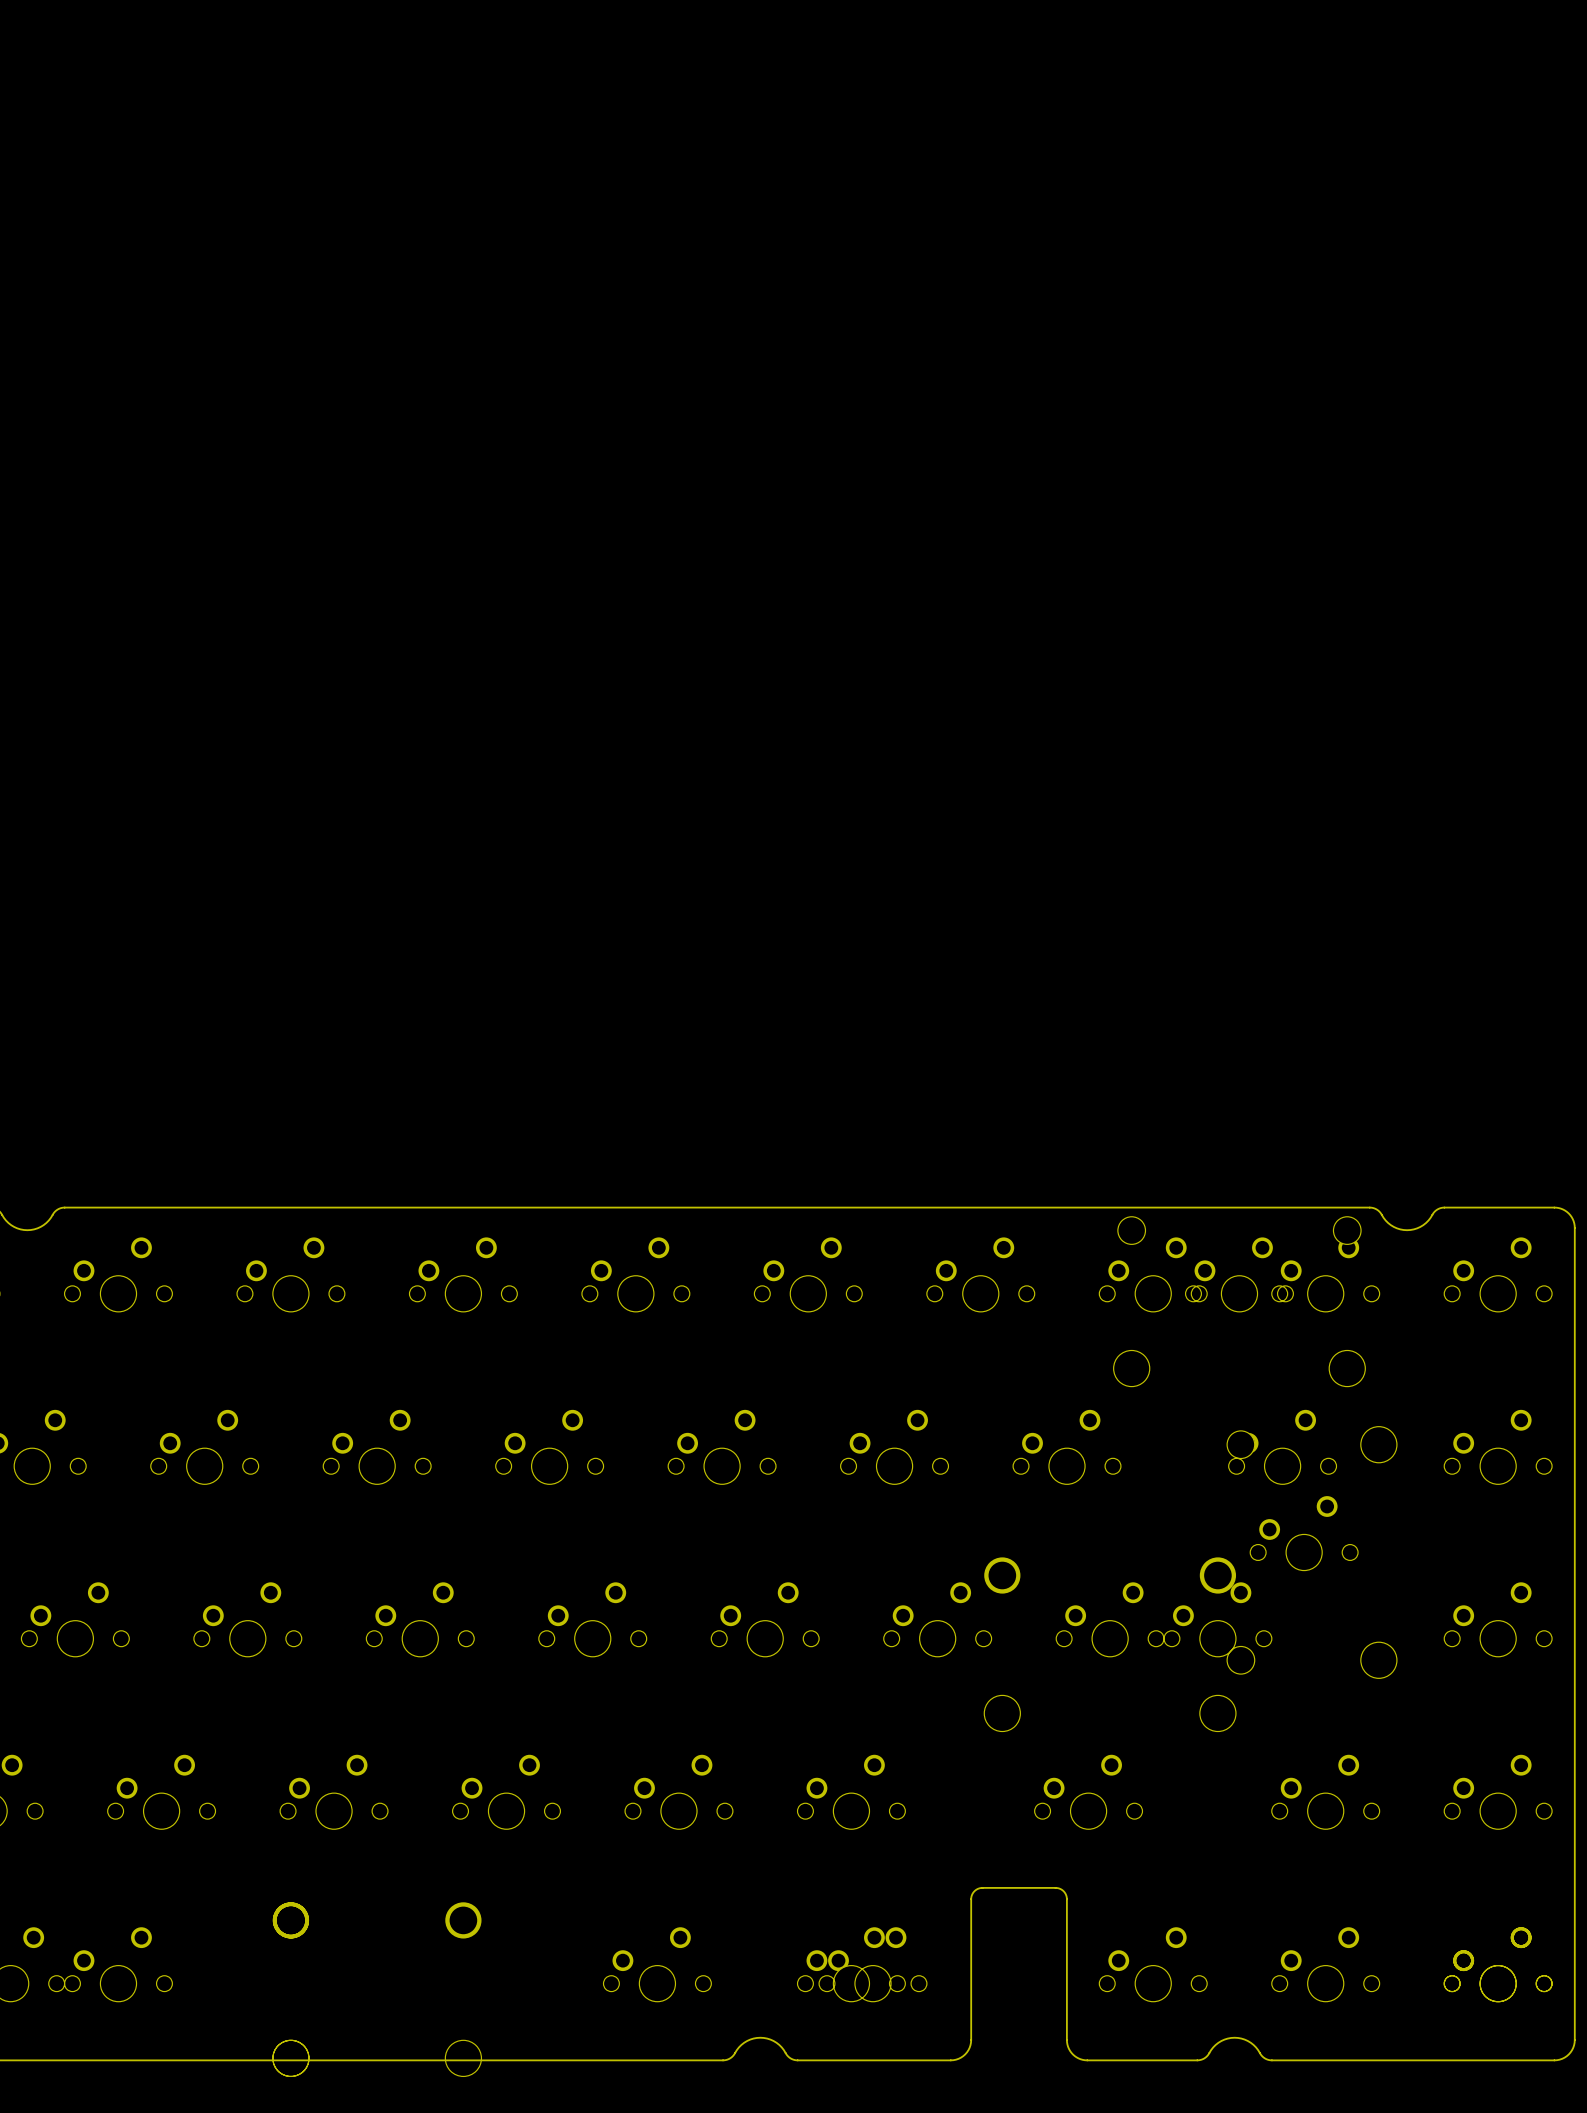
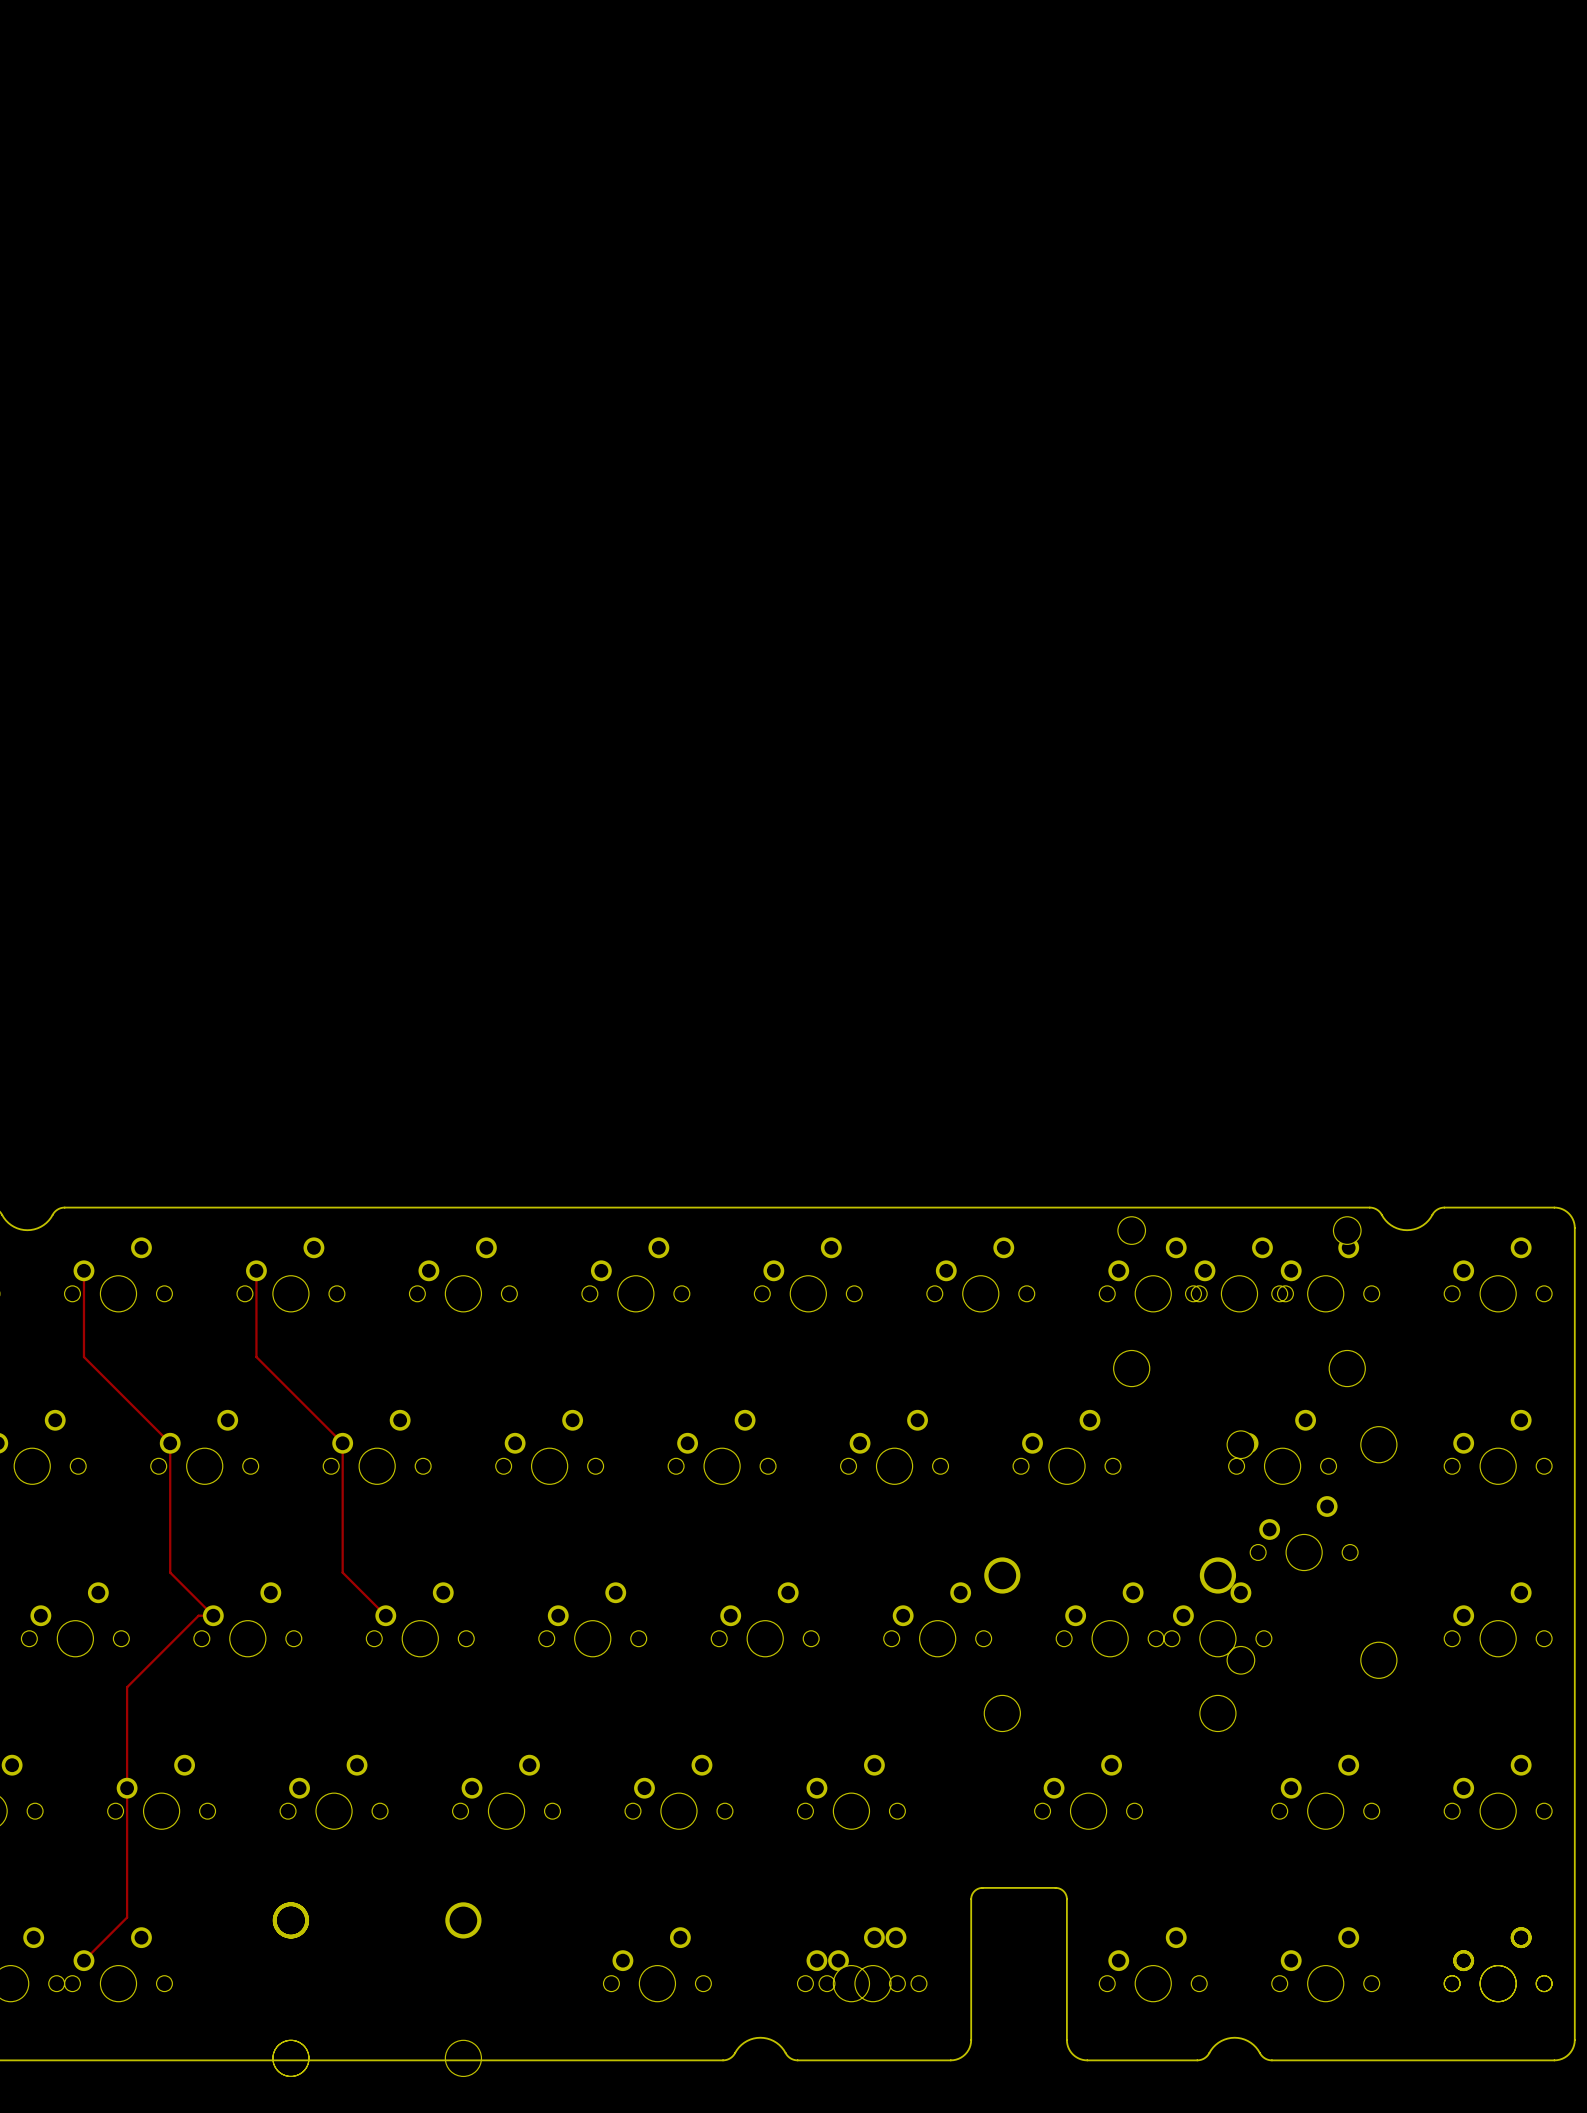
track: none -> (83, 1270) (83, 1357) (170, 1443) (170, 1572) (213, 1615) (198, 1615) (127, 1687) (127, 1917) (83, 1960)
track: none -> (256, 1270) (256, 1357) (342, 1443) (342, 1572) (385, 1615)

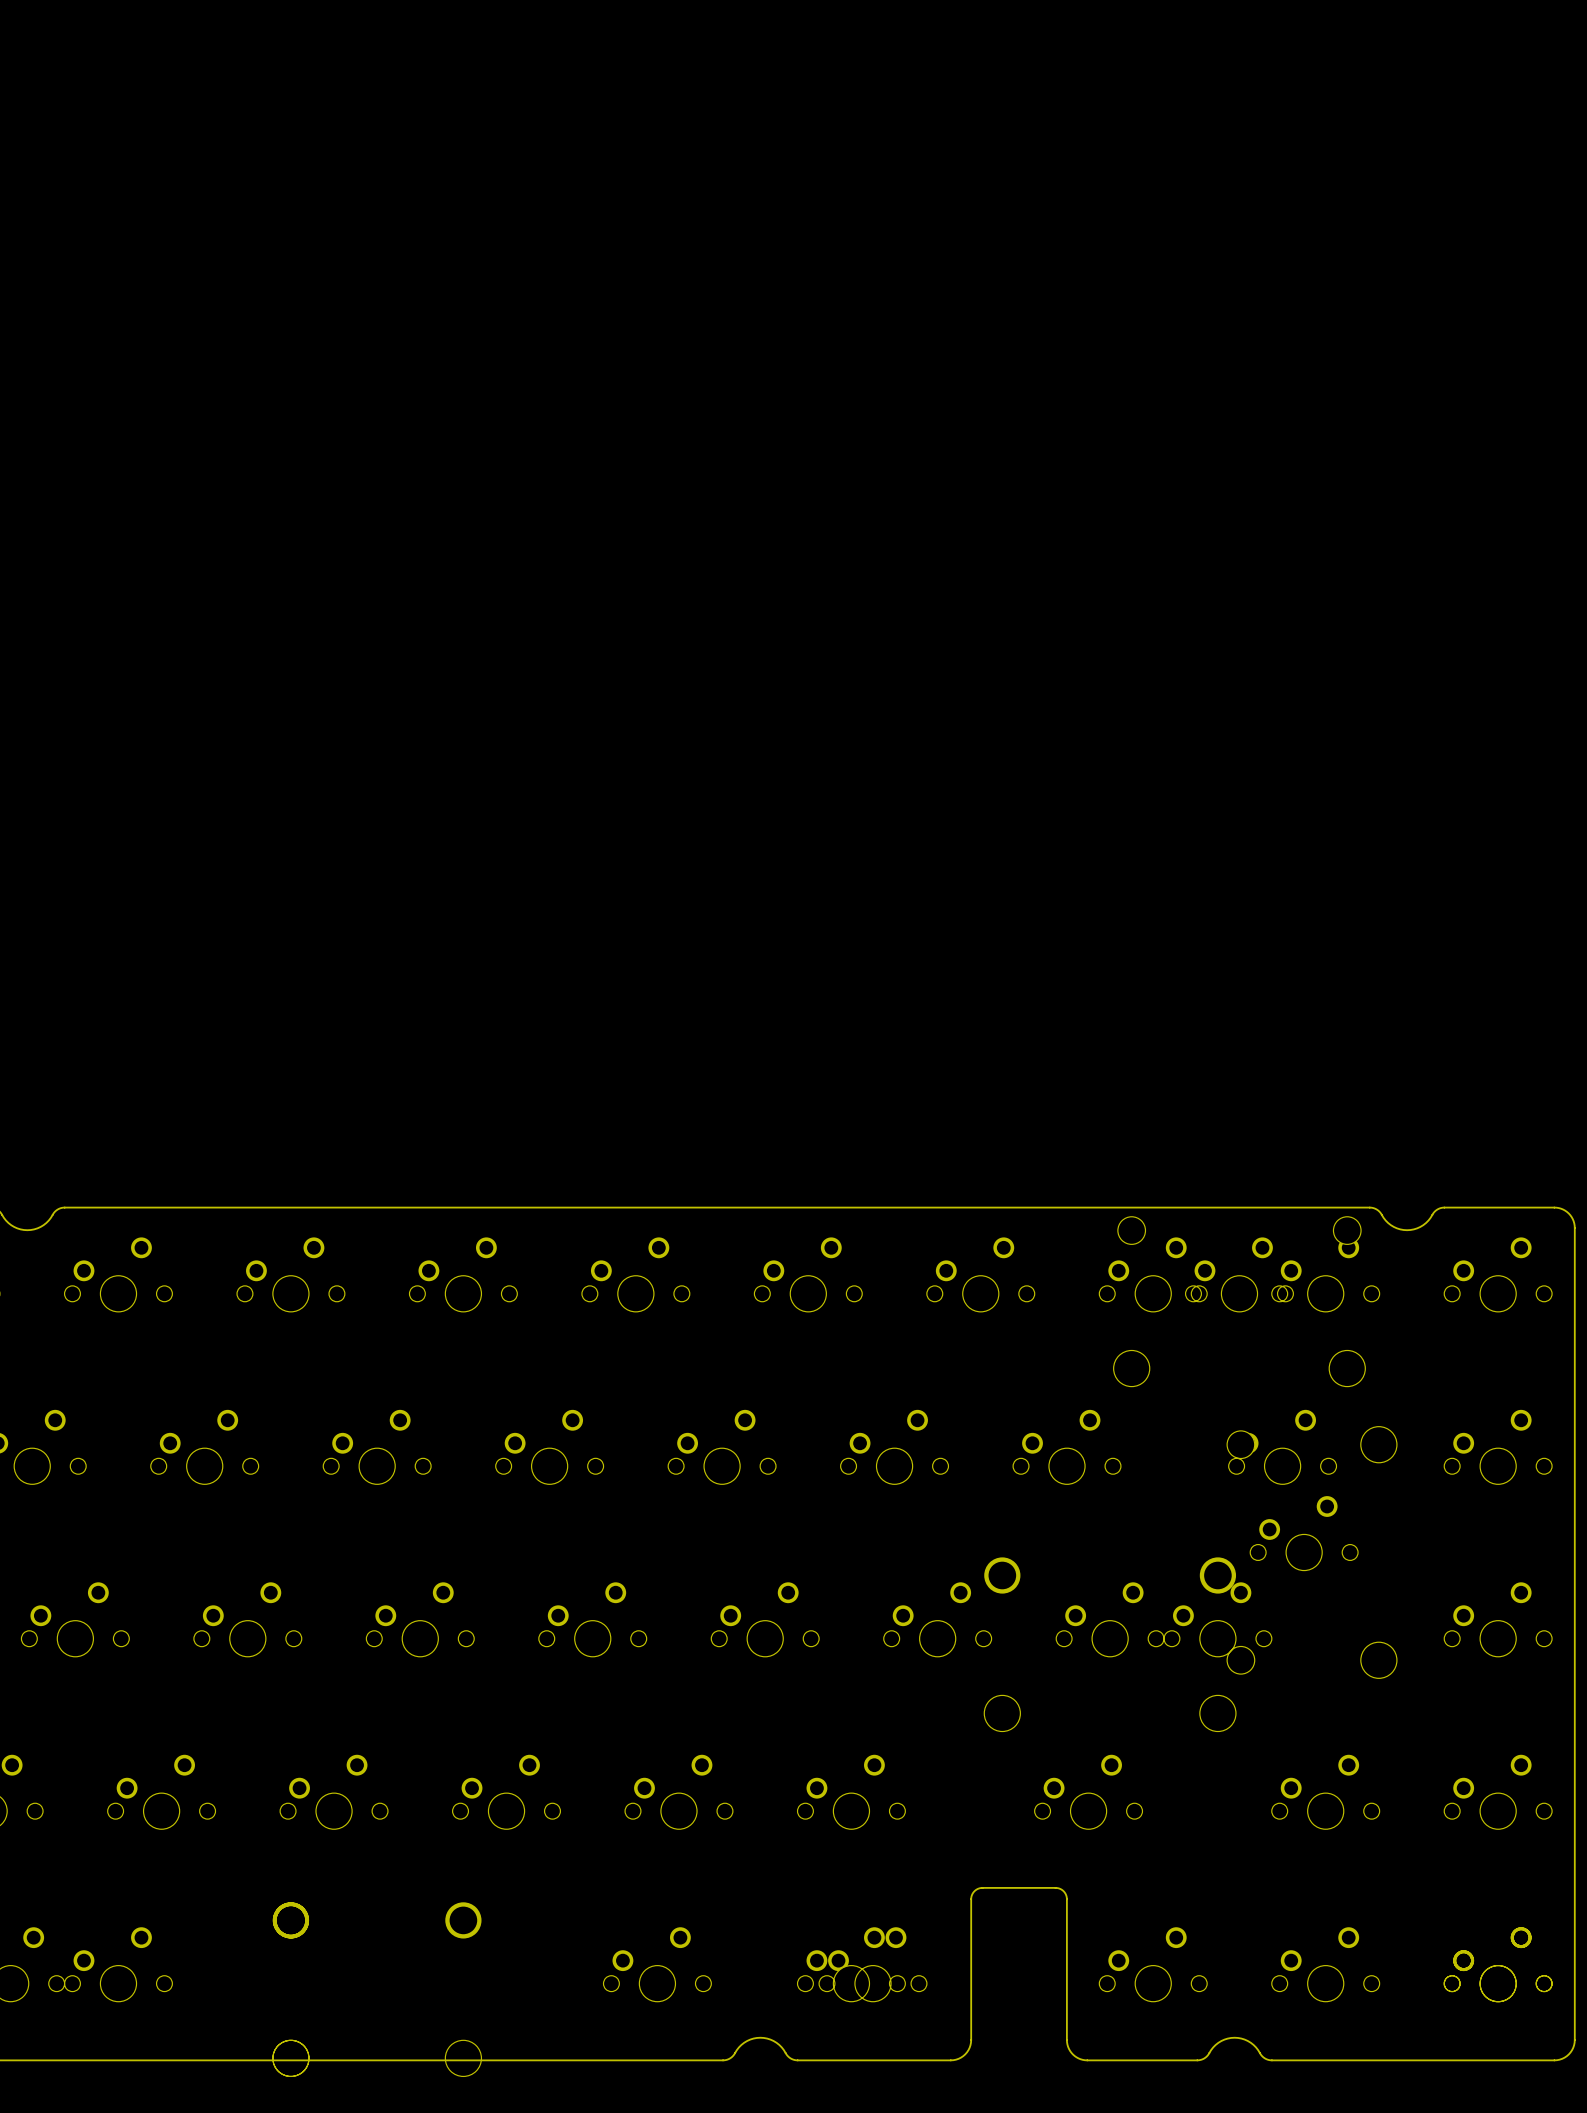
track: (83, 1270) (83, 1357) (170, 1443) (170, 1572) (213, 1615) (198, 1615) (127, 1687) (127, 1917) (83, 1960) -> none
track: (256, 1270) (256, 1357) (342, 1443) (342, 1572) (385, 1615) -> none

